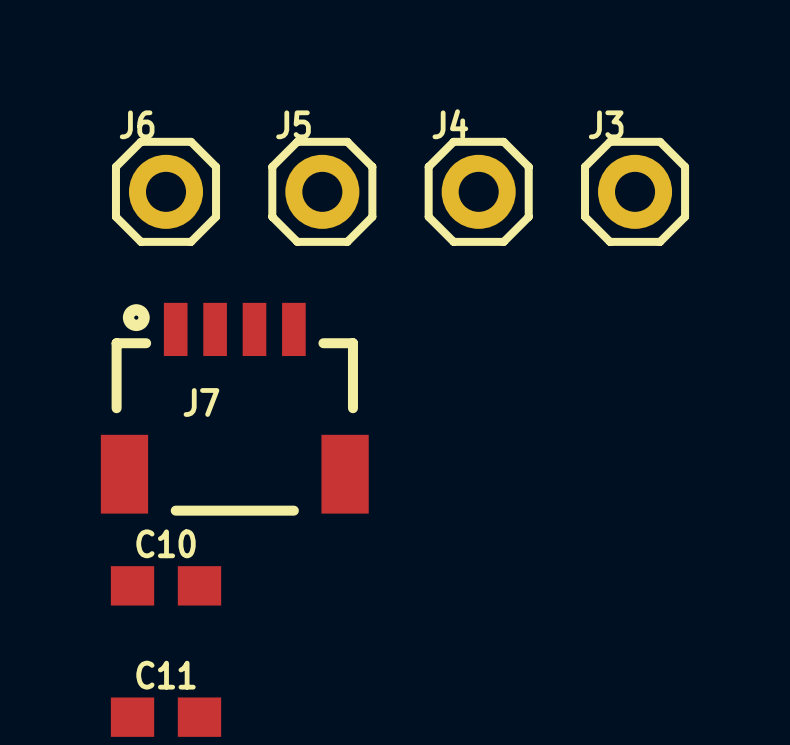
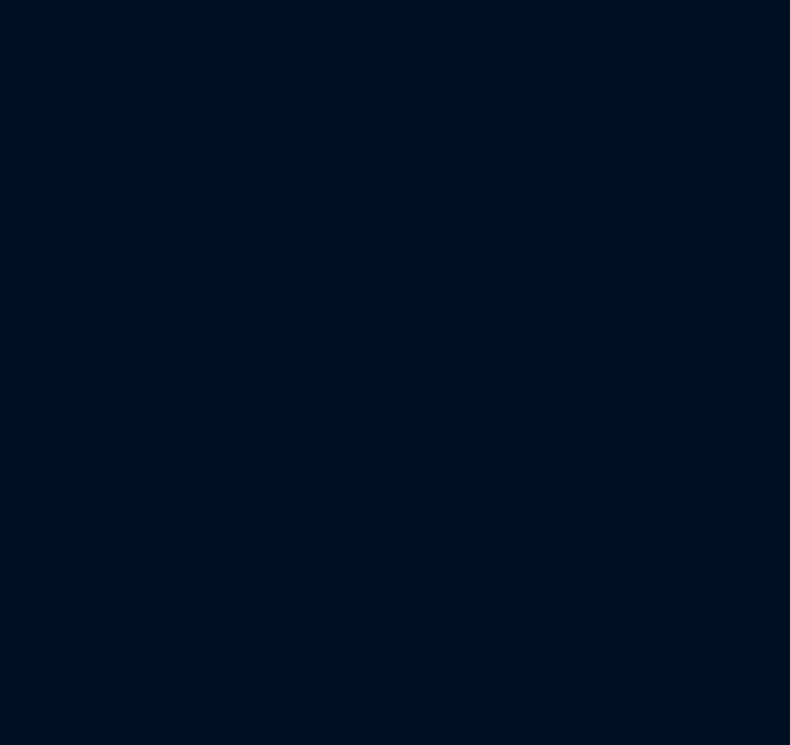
J6: (166, 191) -> none
J5: (322, 191) -> none
J4: (478, 191) -> none
J3: (635, 191) -> none
J7: (234, 409) -> none
C10: (166, 585) -> none
C11: (166, 717) -> none

